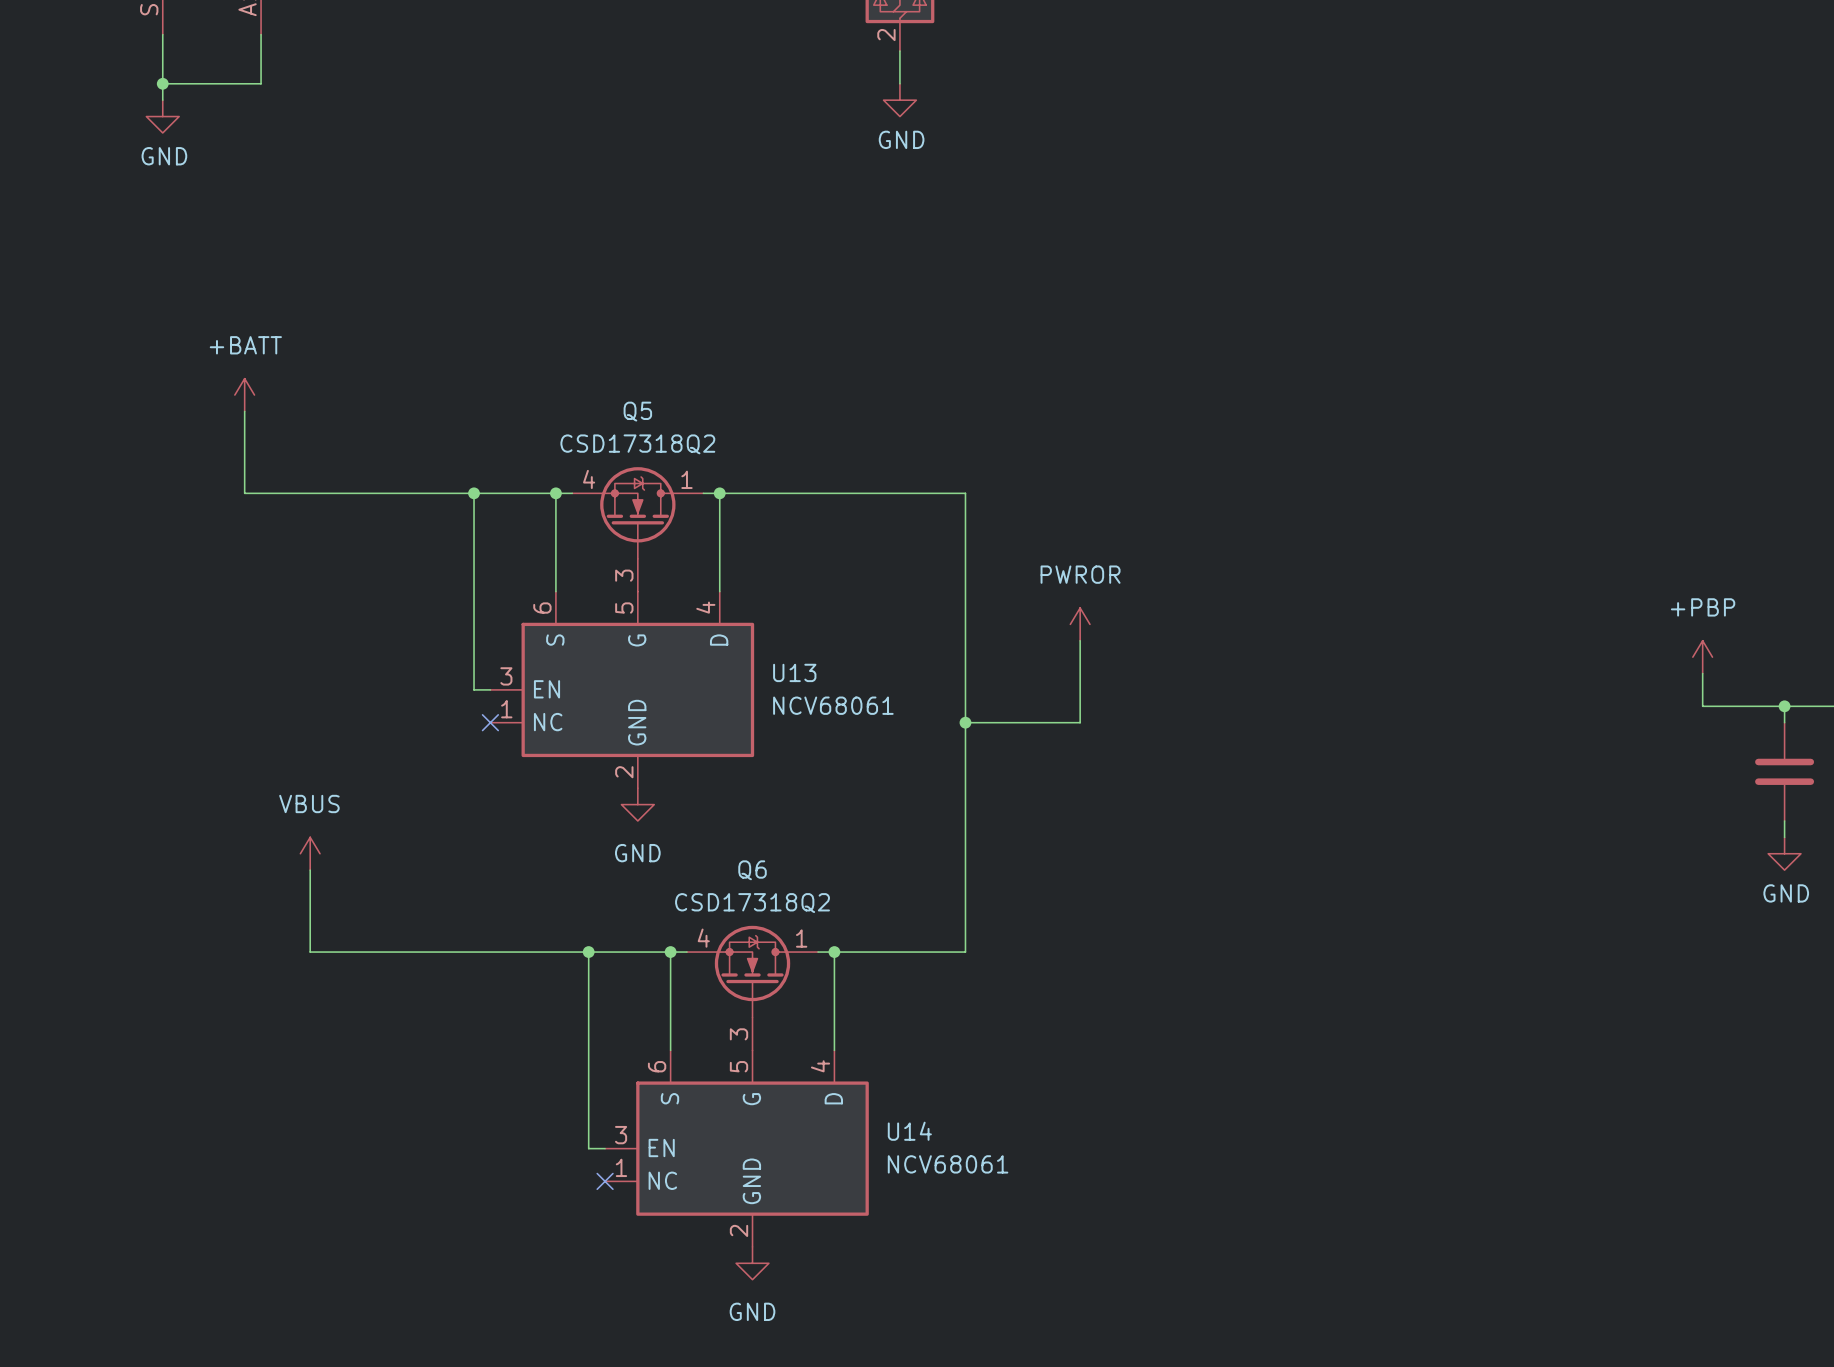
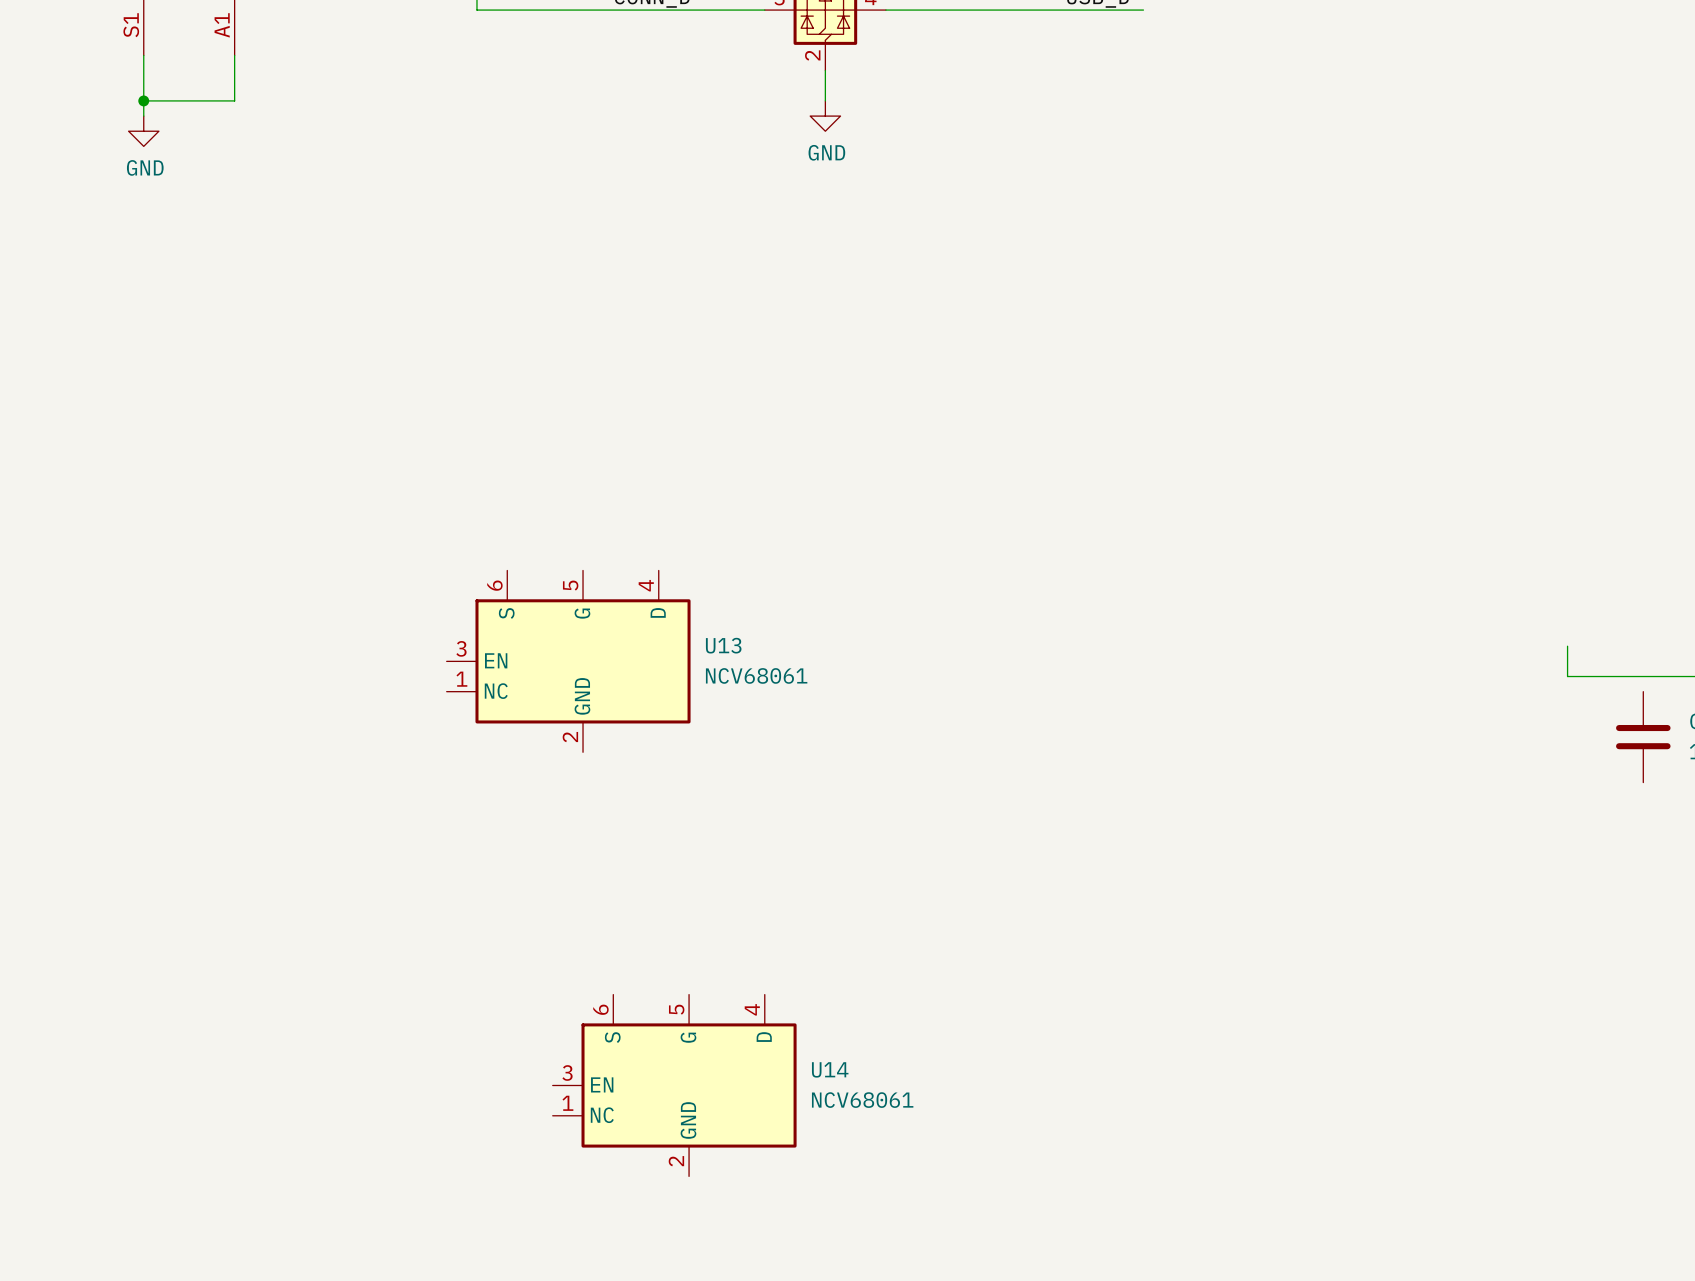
power symbol: +BATT (244, 395) -> none
wire: (244, 411) (244, 493) (572, 493) -> none
wire: (474, 493) (474, 689) (490, 689) -> none
junction: (474, 493) -> none
wire: (555, 493) (555, 591) -> none
junction: (555, 493) -> none
wire: (703, 493) (965, 493) (965, 952) (818, 952) -> none
wire: (719, 493) (719, 591) -> none
junction: (719, 493) -> none
Q5: CSD17318Q2 (637, 529) -> none
power symbol: PWROR (1080, 624) -> none
wire: (1080, 640) (1080, 722) (965, 722) -> none
power symbol: +PBP (1702, 657) -> none
wire: (1784, 706) (1784, 722) -> none
junction: (1784, 706) -> none
no-connect mark: (490, 722) -> none
junction: (965, 722) -> none
power symbol: GND (637, 804) -> none
wire: (1784, 820) (1784, 837) -> none
power symbol: VBUS (310, 853) -> none
power symbol: GND (1784, 853) -> none
wire: (310, 870) (310, 952) (686, 952) -> none
wire: (588, 952) (588, 1148) (605, 1148) -> none
junction: (588, 952) -> none
wire: (670, 952) (670, 1050) -> none
junction: (670, 952) -> none
wire: (834, 952) (834, 1050) -> none
junction: (834, 952) -> none
Q6: CSD17318Q2 (752, 988) -> none
no-connect mark: (605, 1181) -> none
power symbol: GND (752, 1263) -> none

